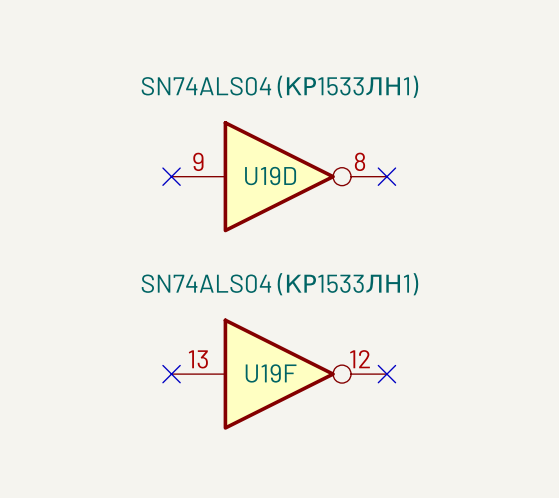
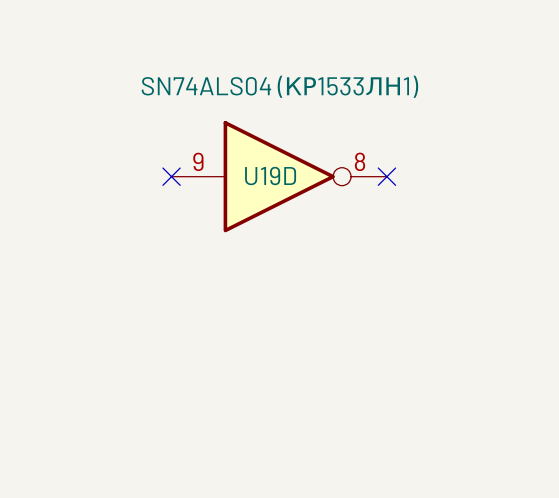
no-connect mark: (171, 374) -> none
U19F: SN74ALS04 (КР1533ЛН1) (279, 374) -> none
no-connect mark: (386, 374) -> none

